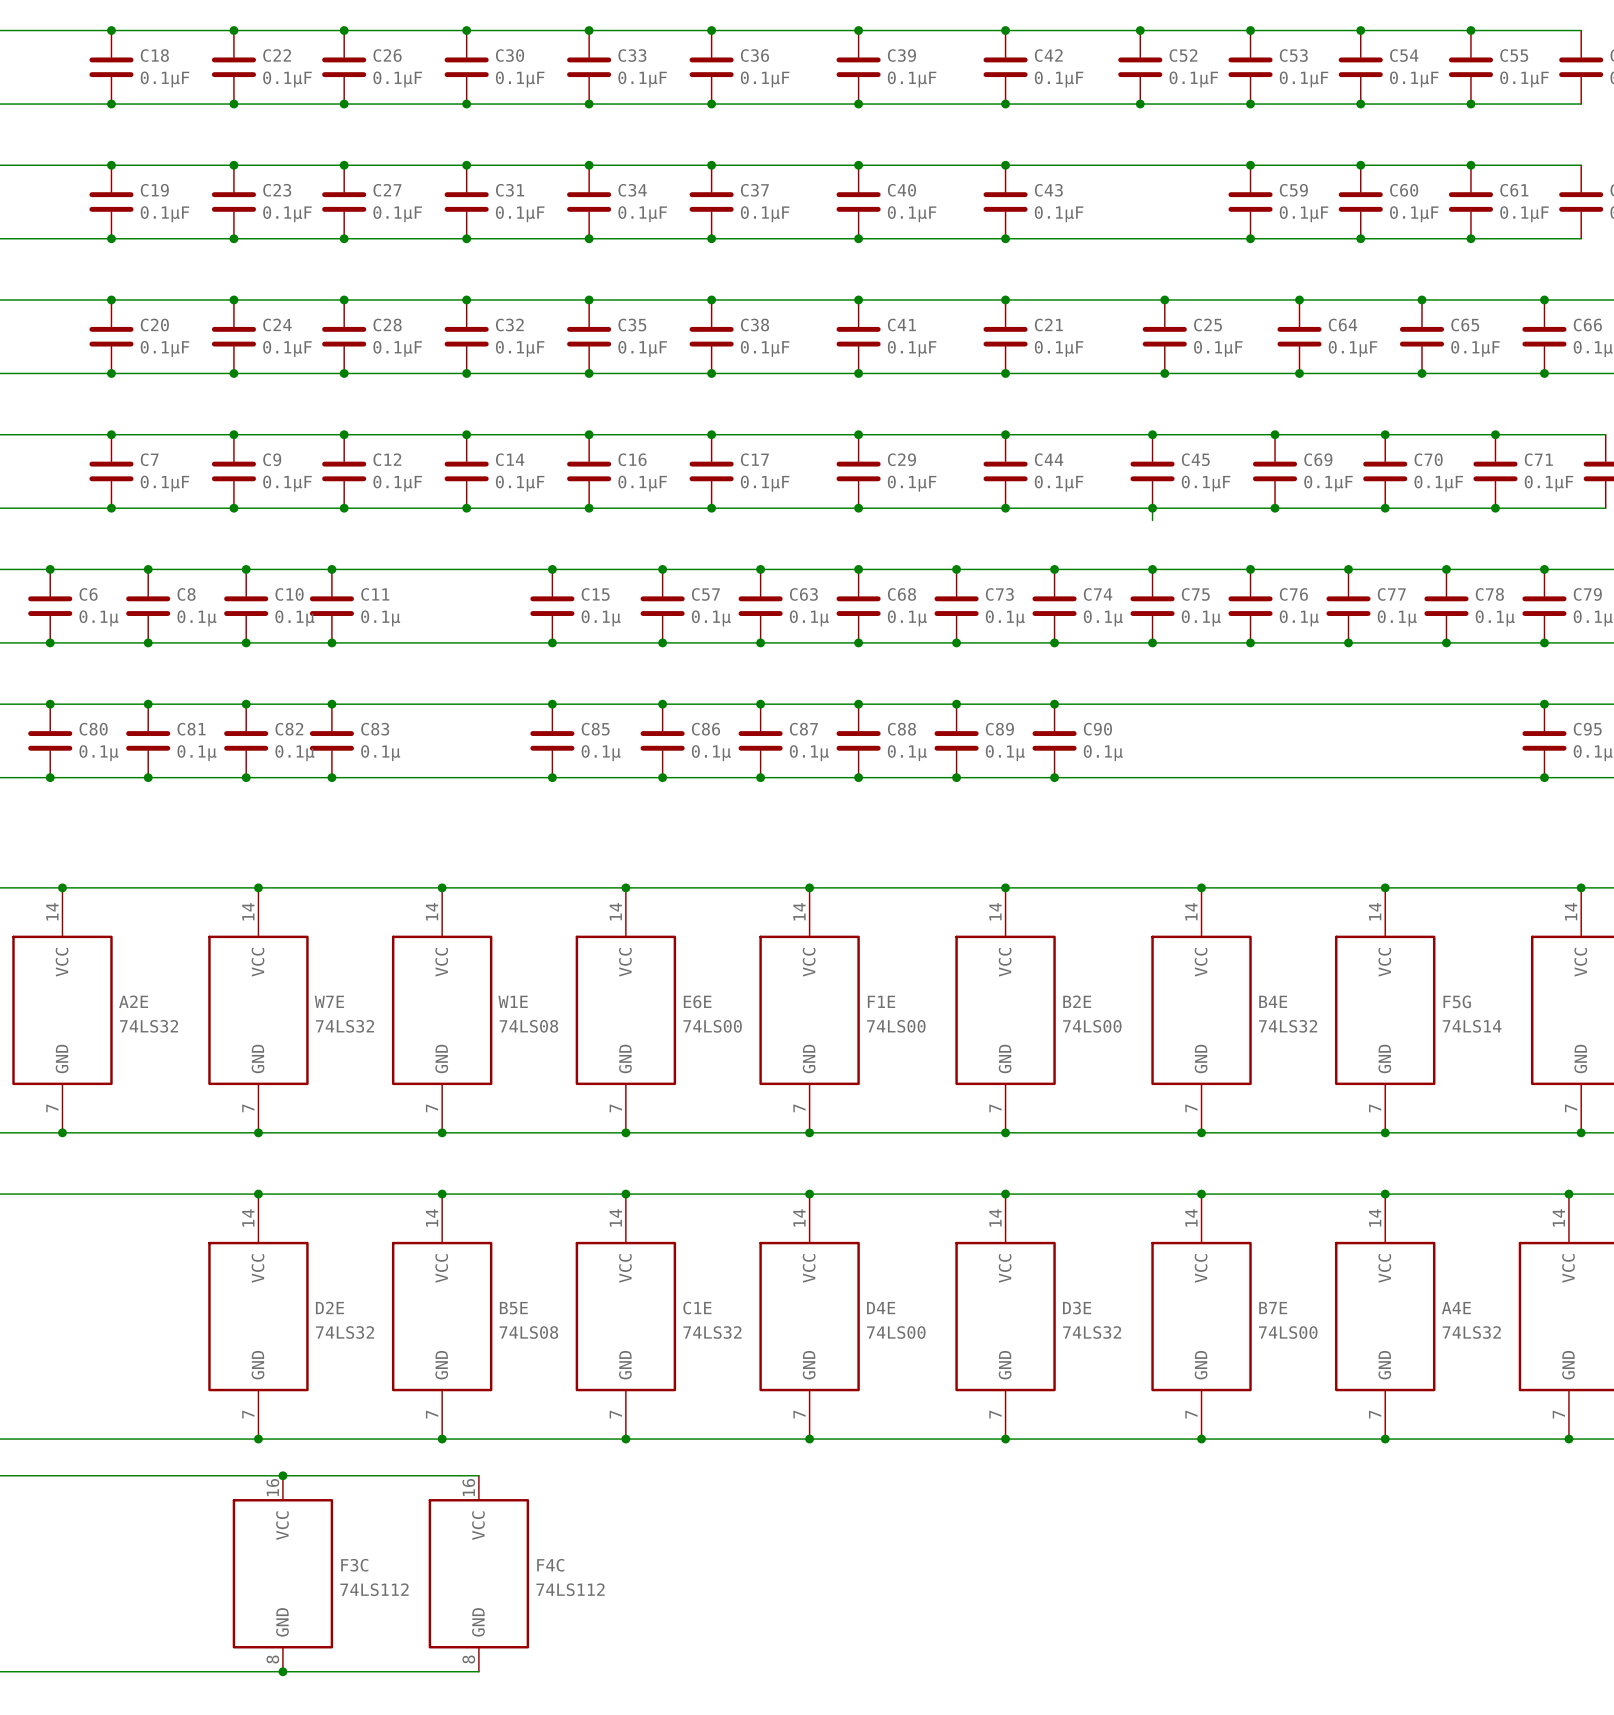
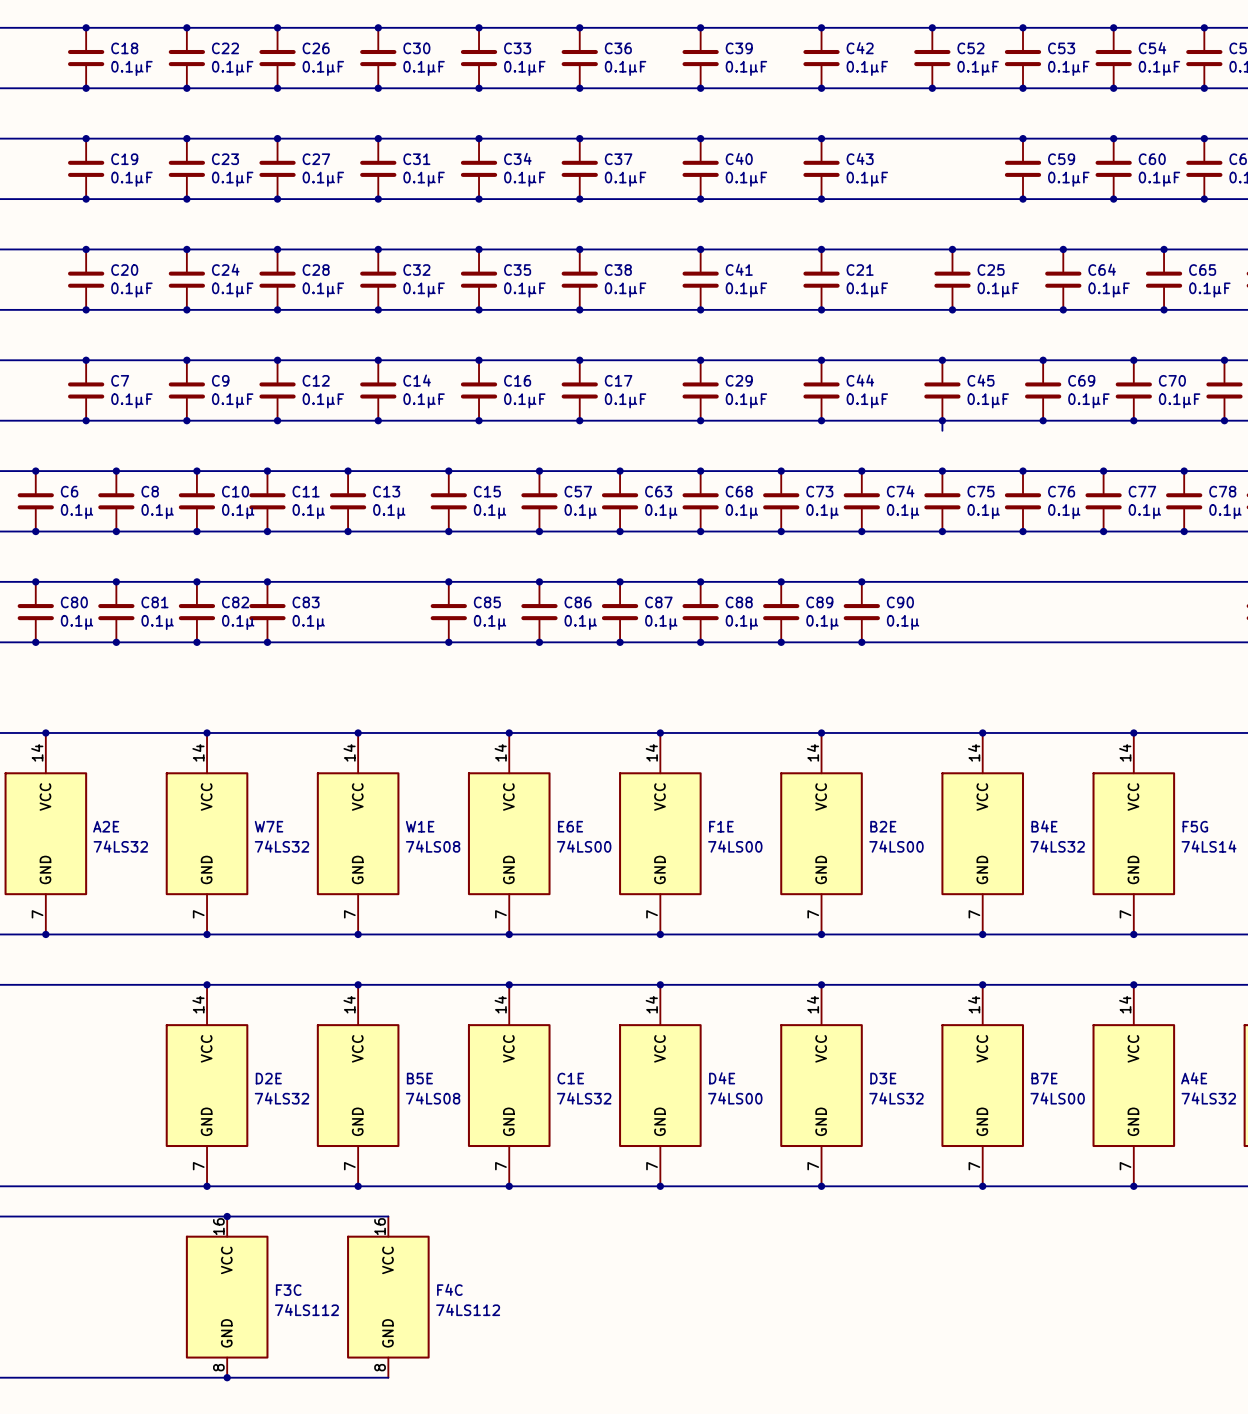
junction: none -> (348, 471)
C13: none -> 0.1µ (348, 501)
junction: none -> (348, 531)

